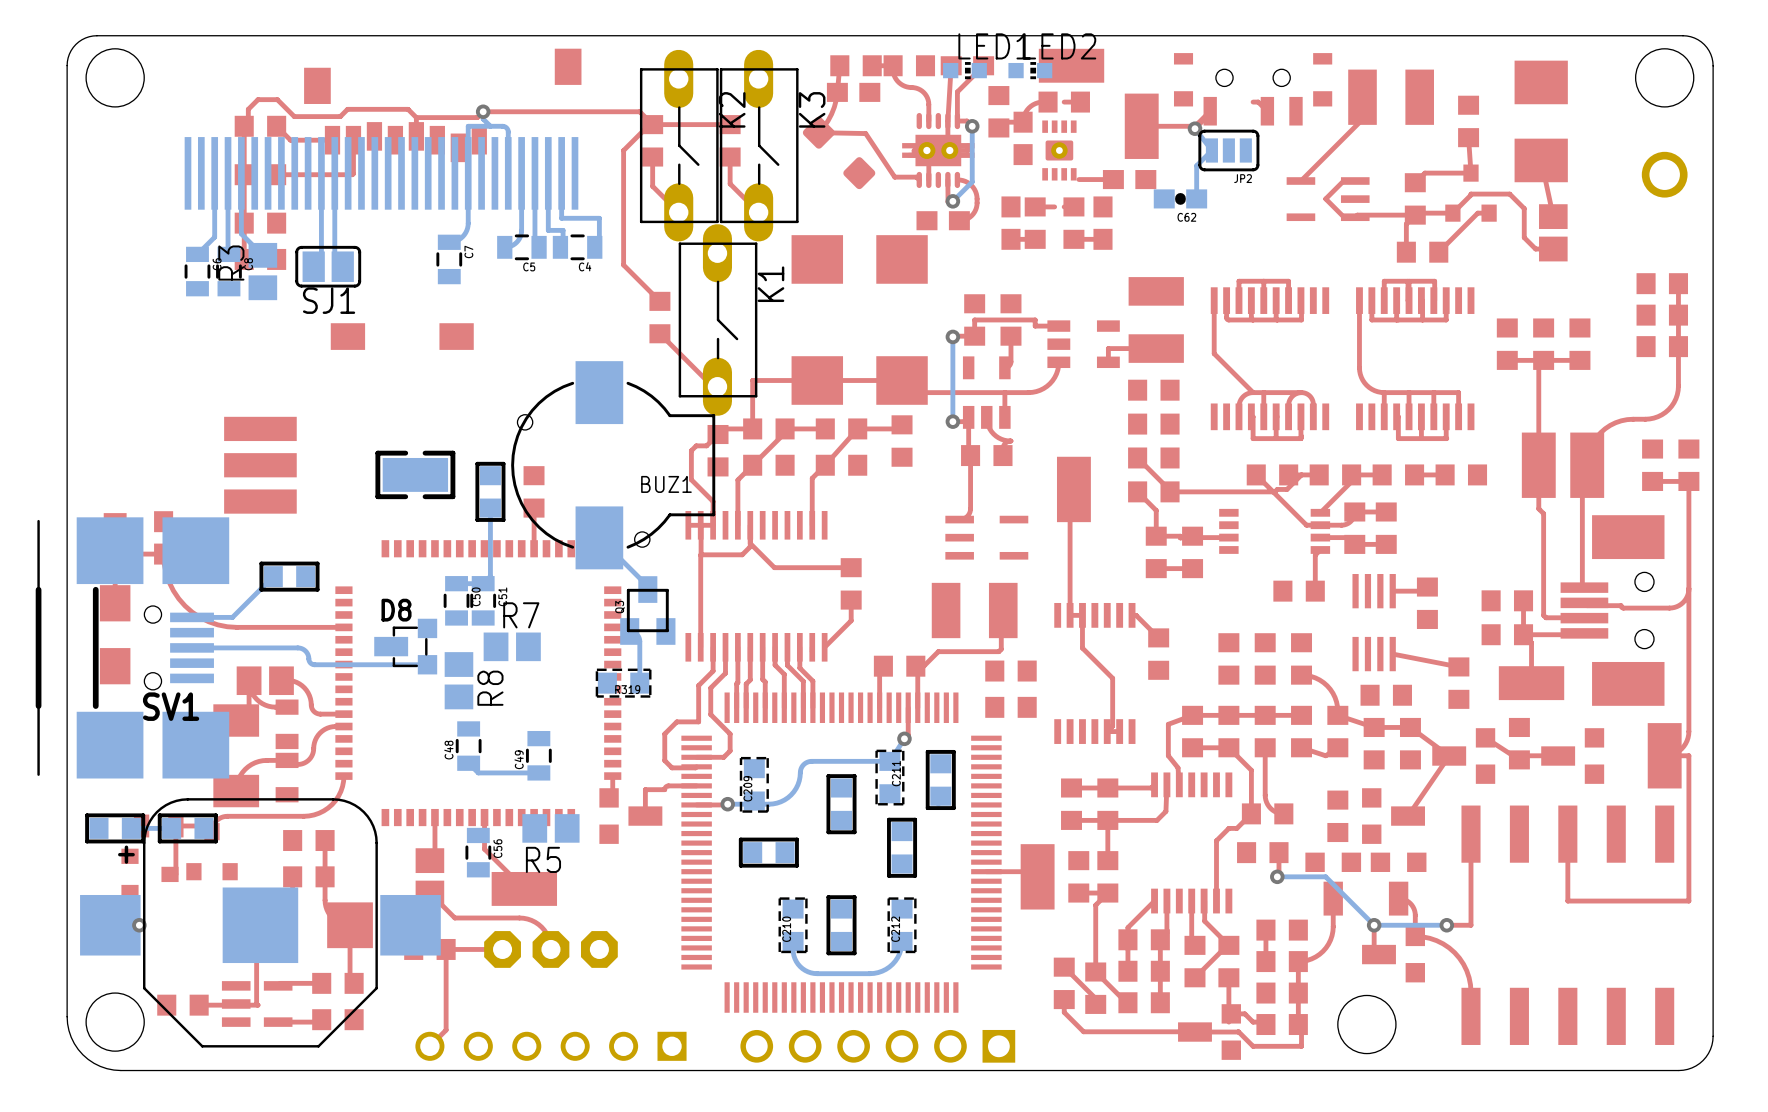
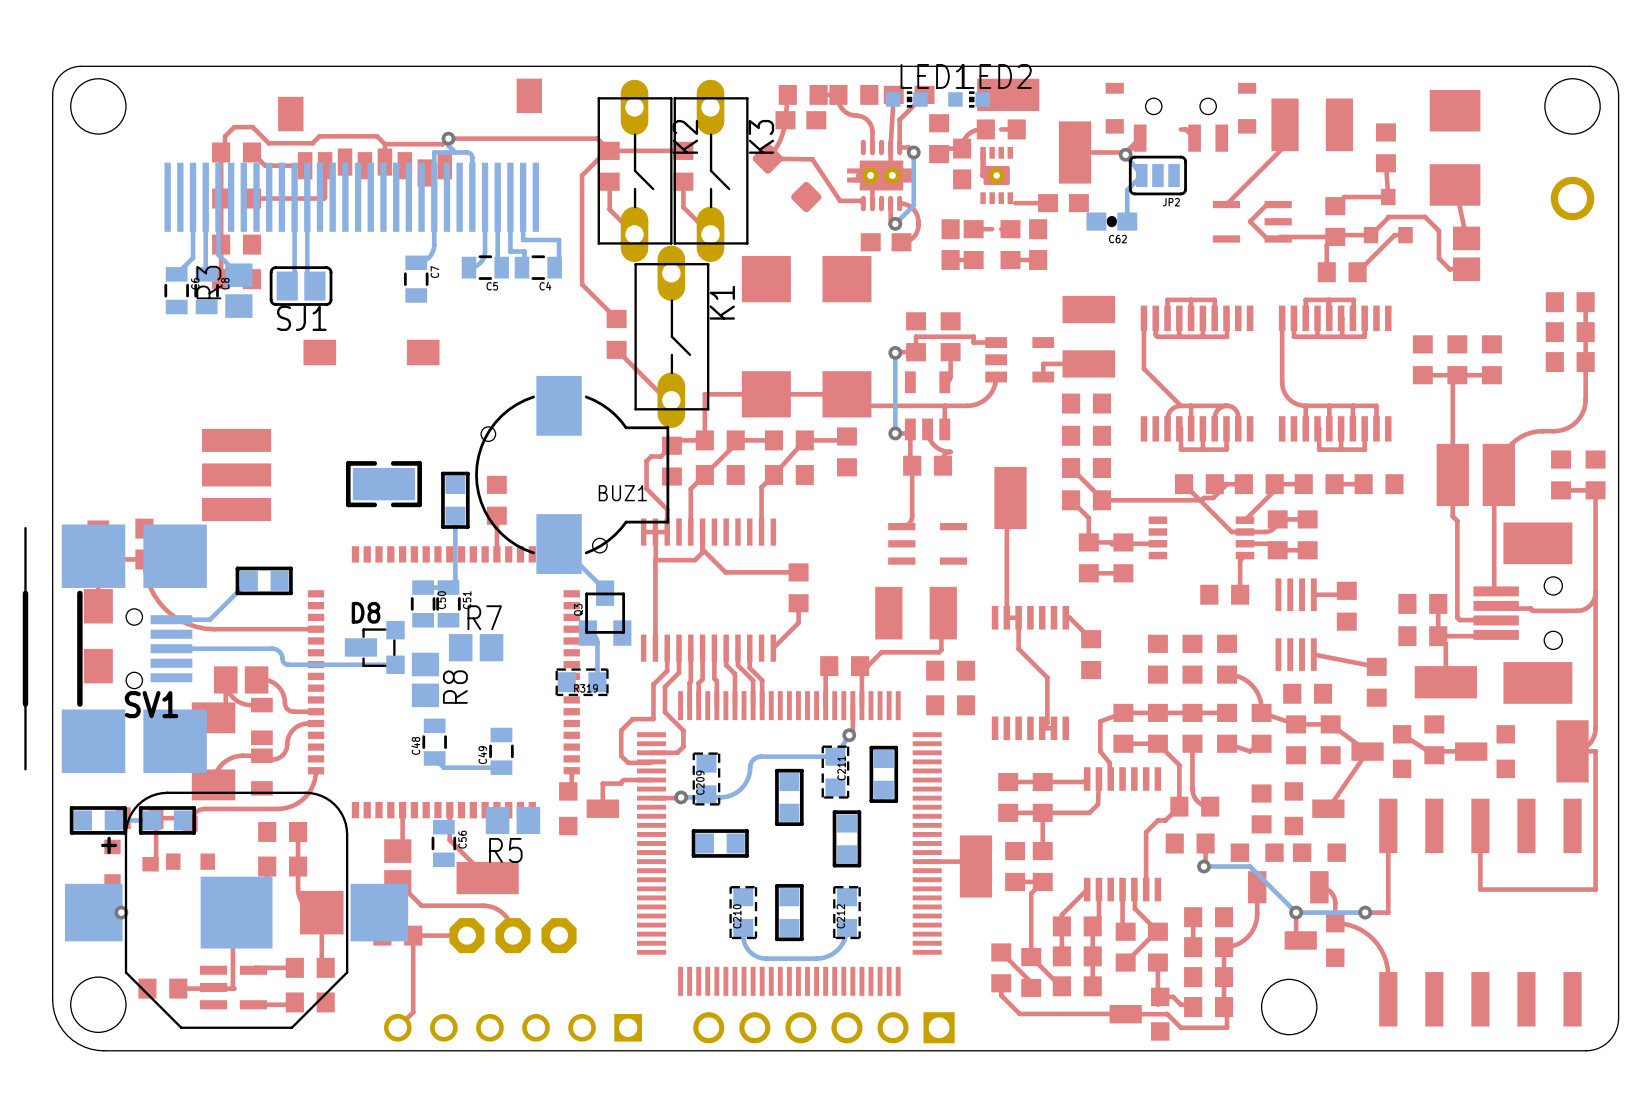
top track: none -> (983, 152) (983, 175) (996, 175)

